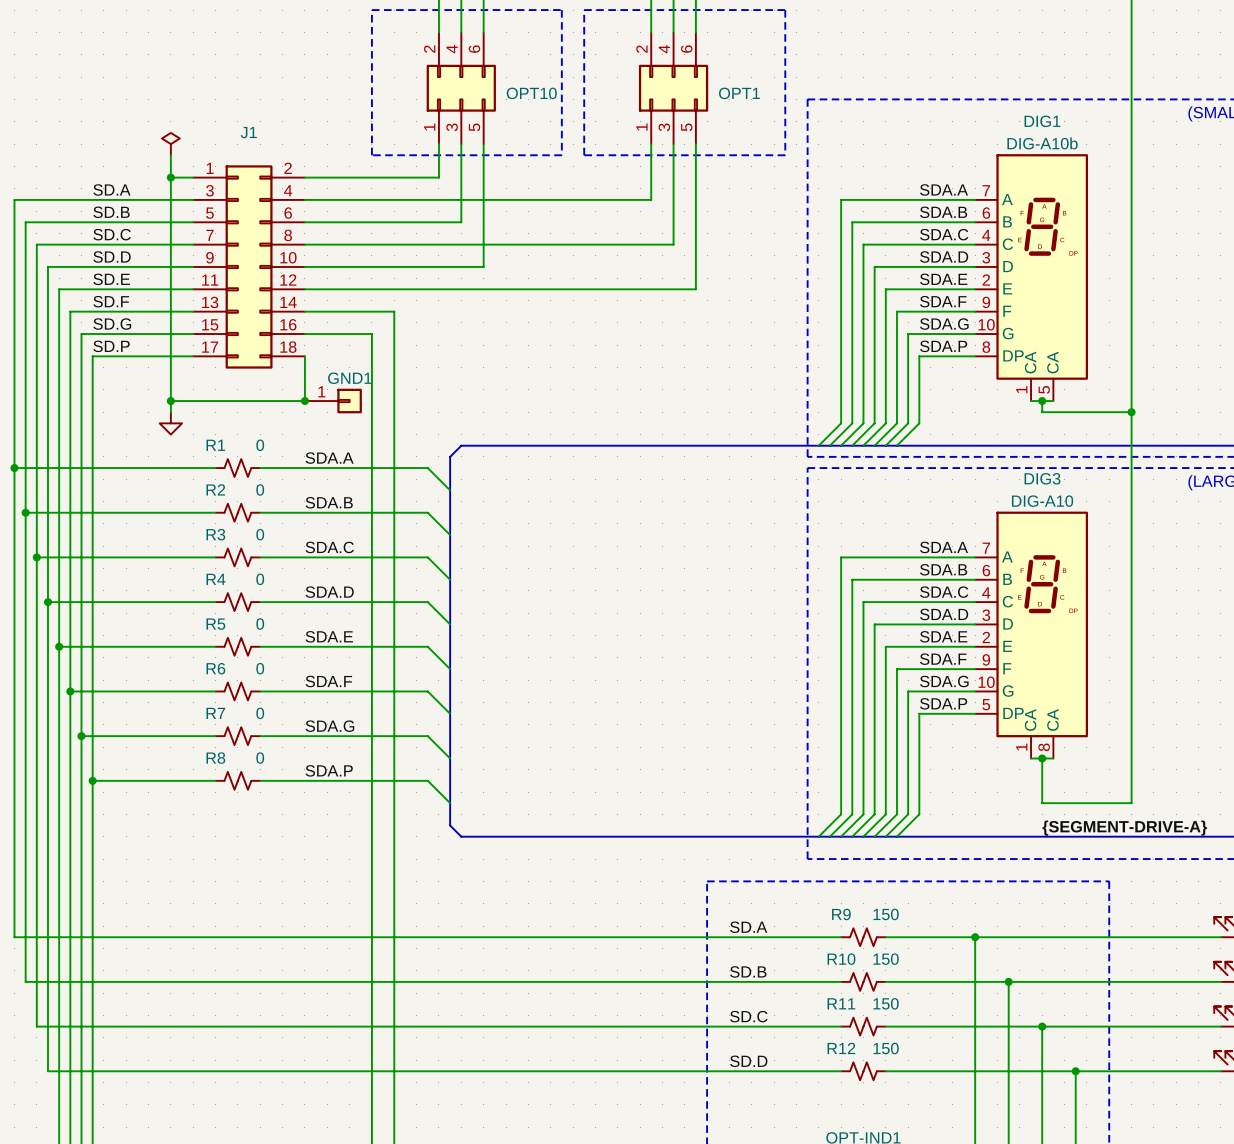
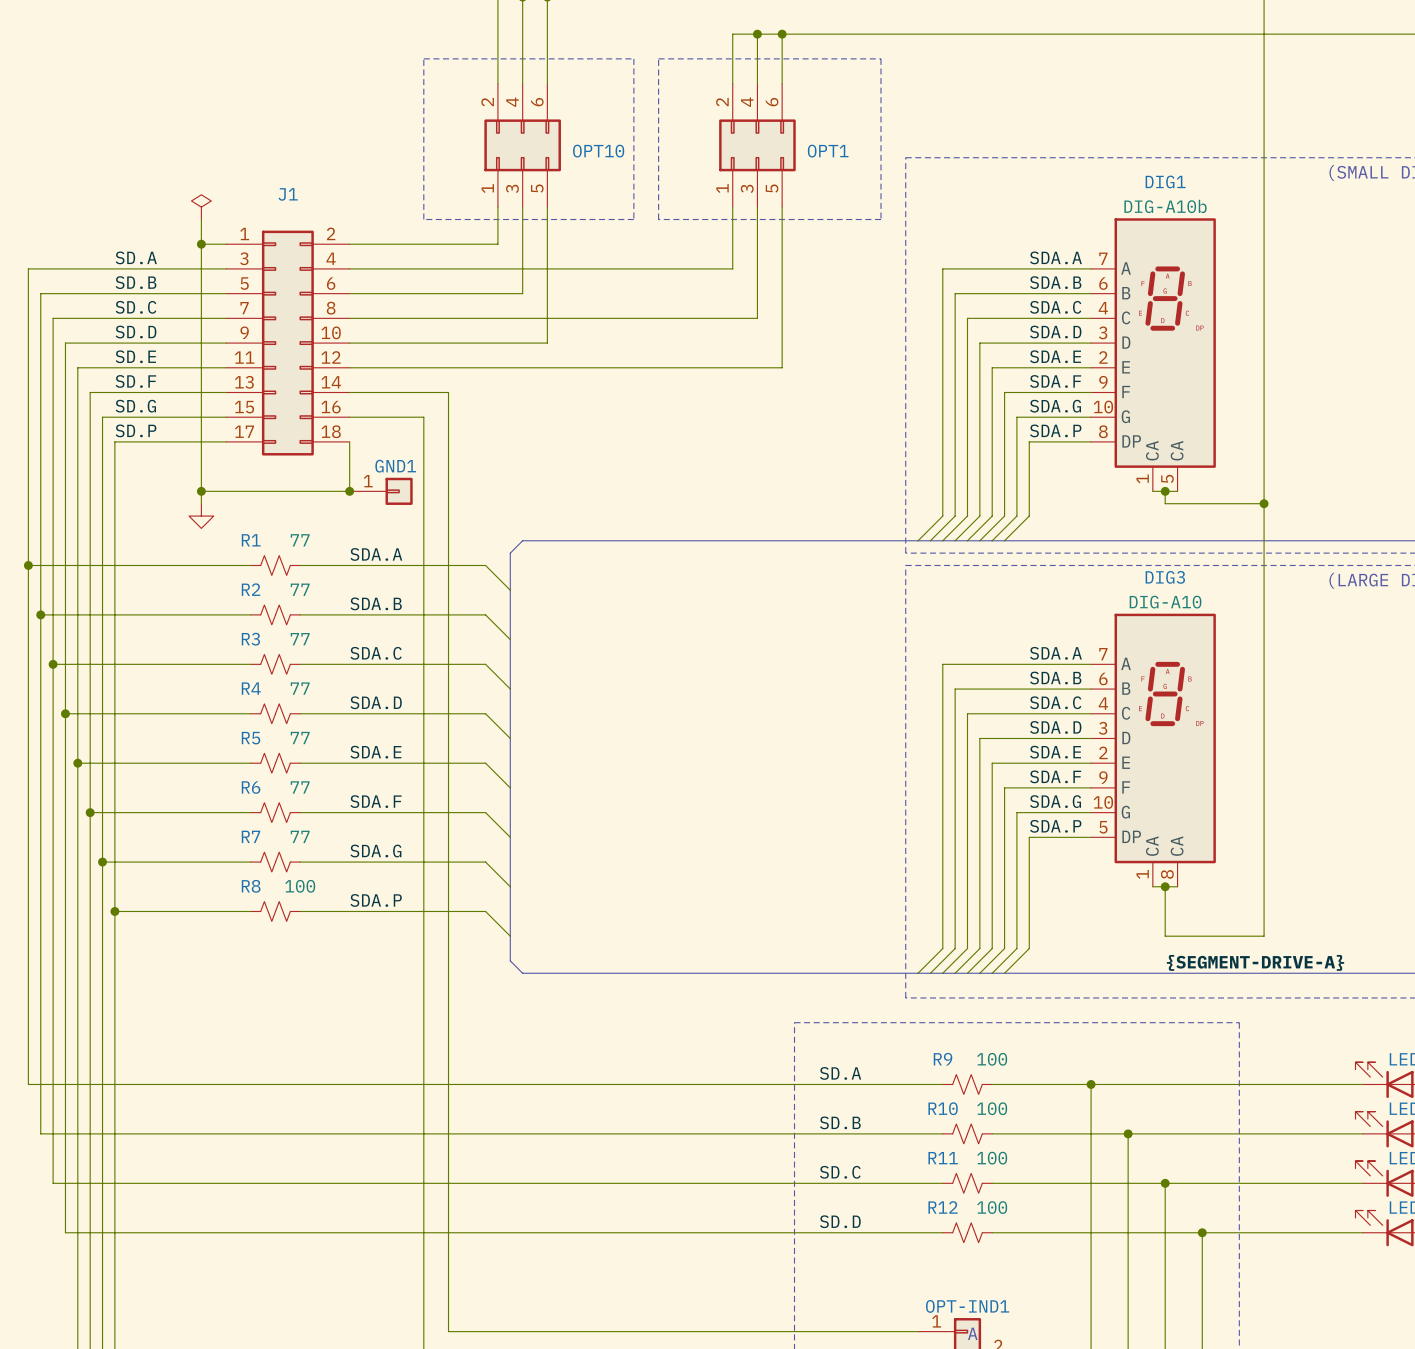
R1 value: 0 (260, 445) -> 77 (300, 540)
R2 value: 0 (260, 489) -> 77 (300, 589)
R3 value: 0 (260, 534) -> 77 (300, 639)
R4 value: 0 (260, 579) -> 77 (300, 688)
R5 value: 0 (260, 624) -> 77 (300, 738)
R6 value: 0 (260, 668) -> 77 (300, 787)
R7 value: 0 (260, 713) -> 77 (300, 836)
R8 value: 0 (260, 758) -> 100 (300, 886)
R9 value: 150 (886, 914) -> 100 (992, 1059)
R10 value: 150 (886, 959) -> 100 (992, 1108)
R11 value: 150 (886, 1003) -> 100 (992, 1158)
R12 value: 150 (886, 1048) -> 100 (992, 1207)

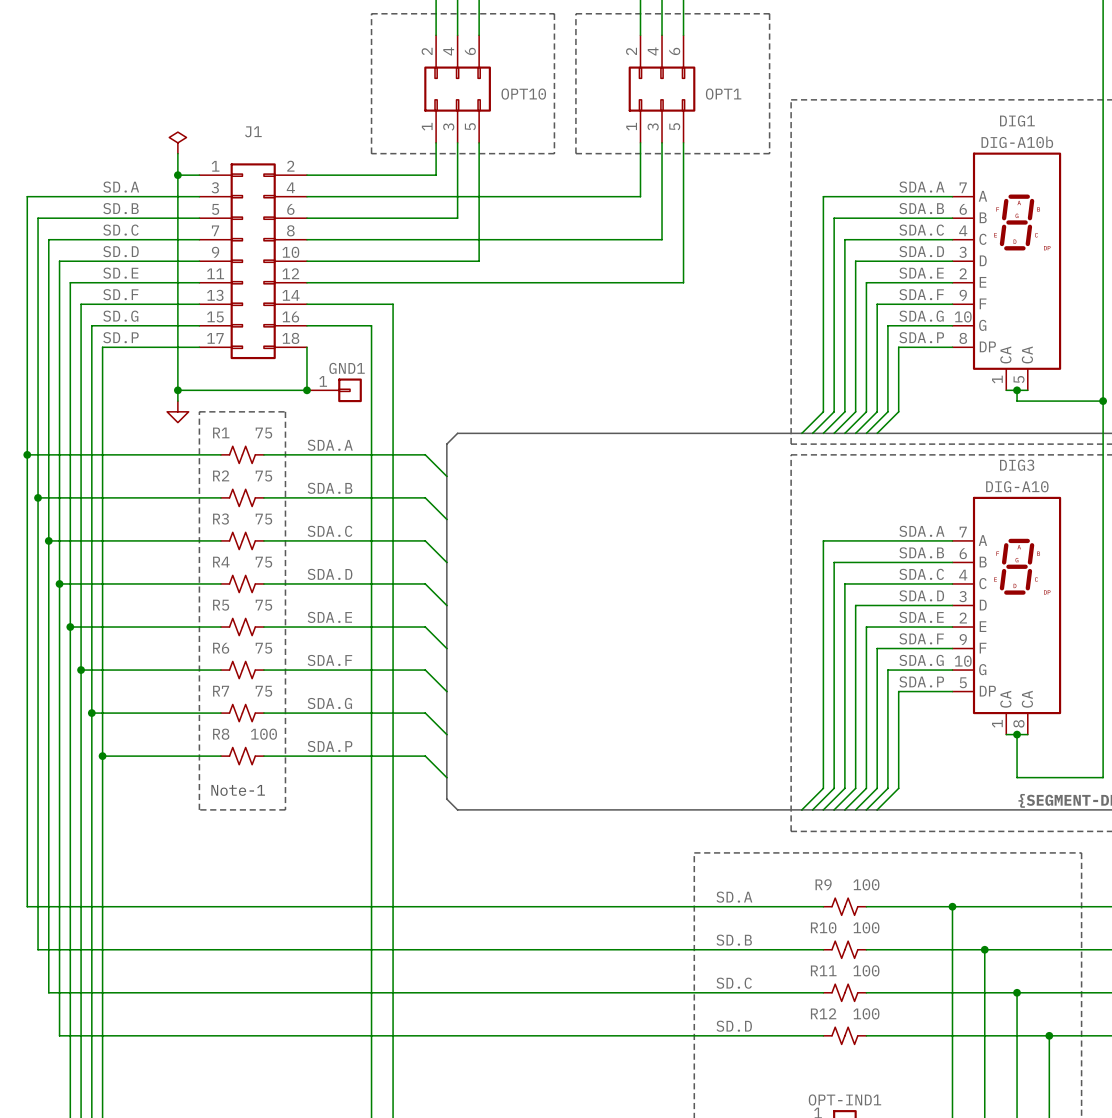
line: none -> (199, 411) (285, 411) (285, 809) (199, 809) (199, 411)
R1 value: 77 (300, 540) -> 75 (263, 433)
R2 value: 77 (300, 589) -> 75 (263, 476)
R3 value: 77 (300, 639) -> 75 (263, 519)
R4 value: 77 (300, 688) -> 75 (263, 562)
R5 value: 77 (300, 738) -> 75 (263, 605)
R6 value: 77 (300, 787) -> 75 (263, 648)
R7 value: 77 (300, 836) -> 75 (263, 691)
text: none -> Note-1 (238, 790)

